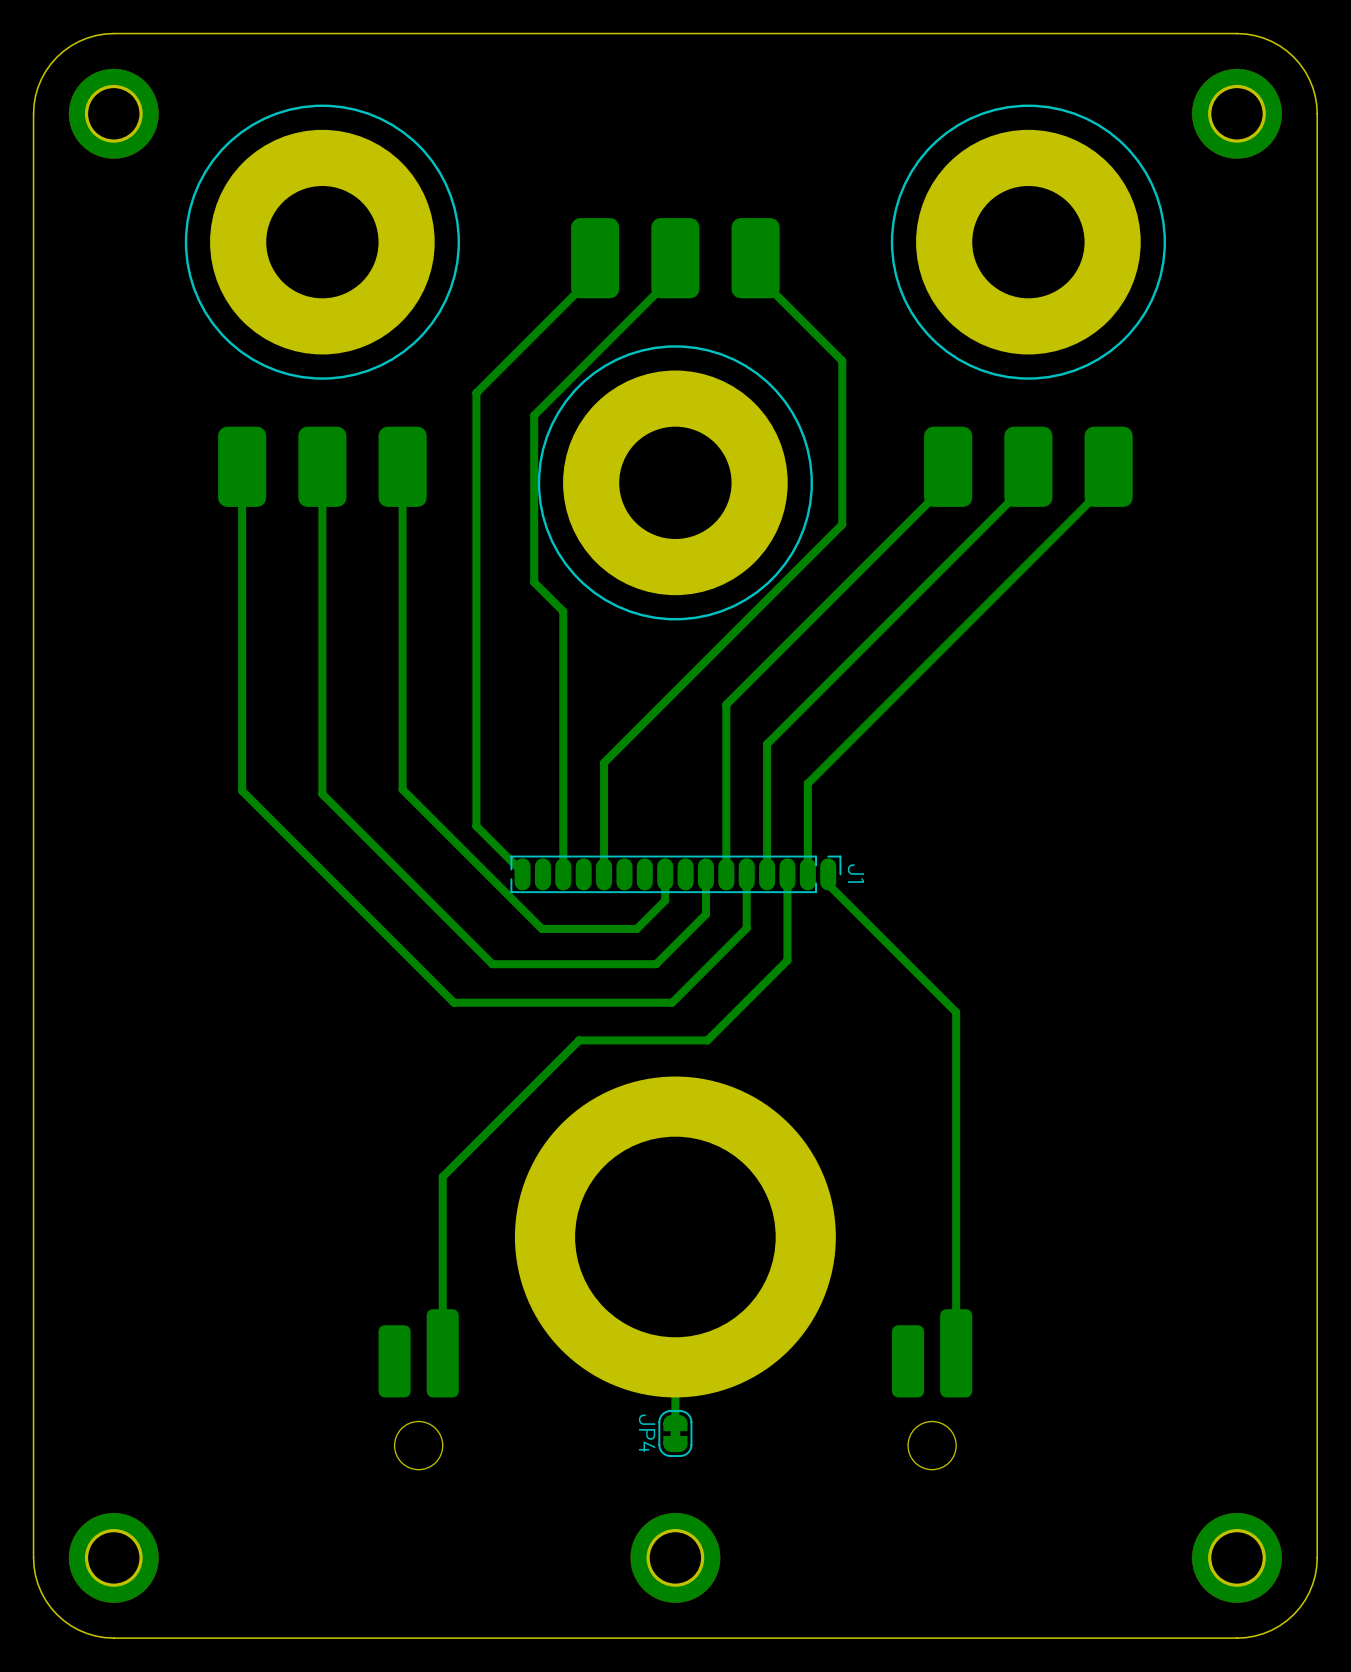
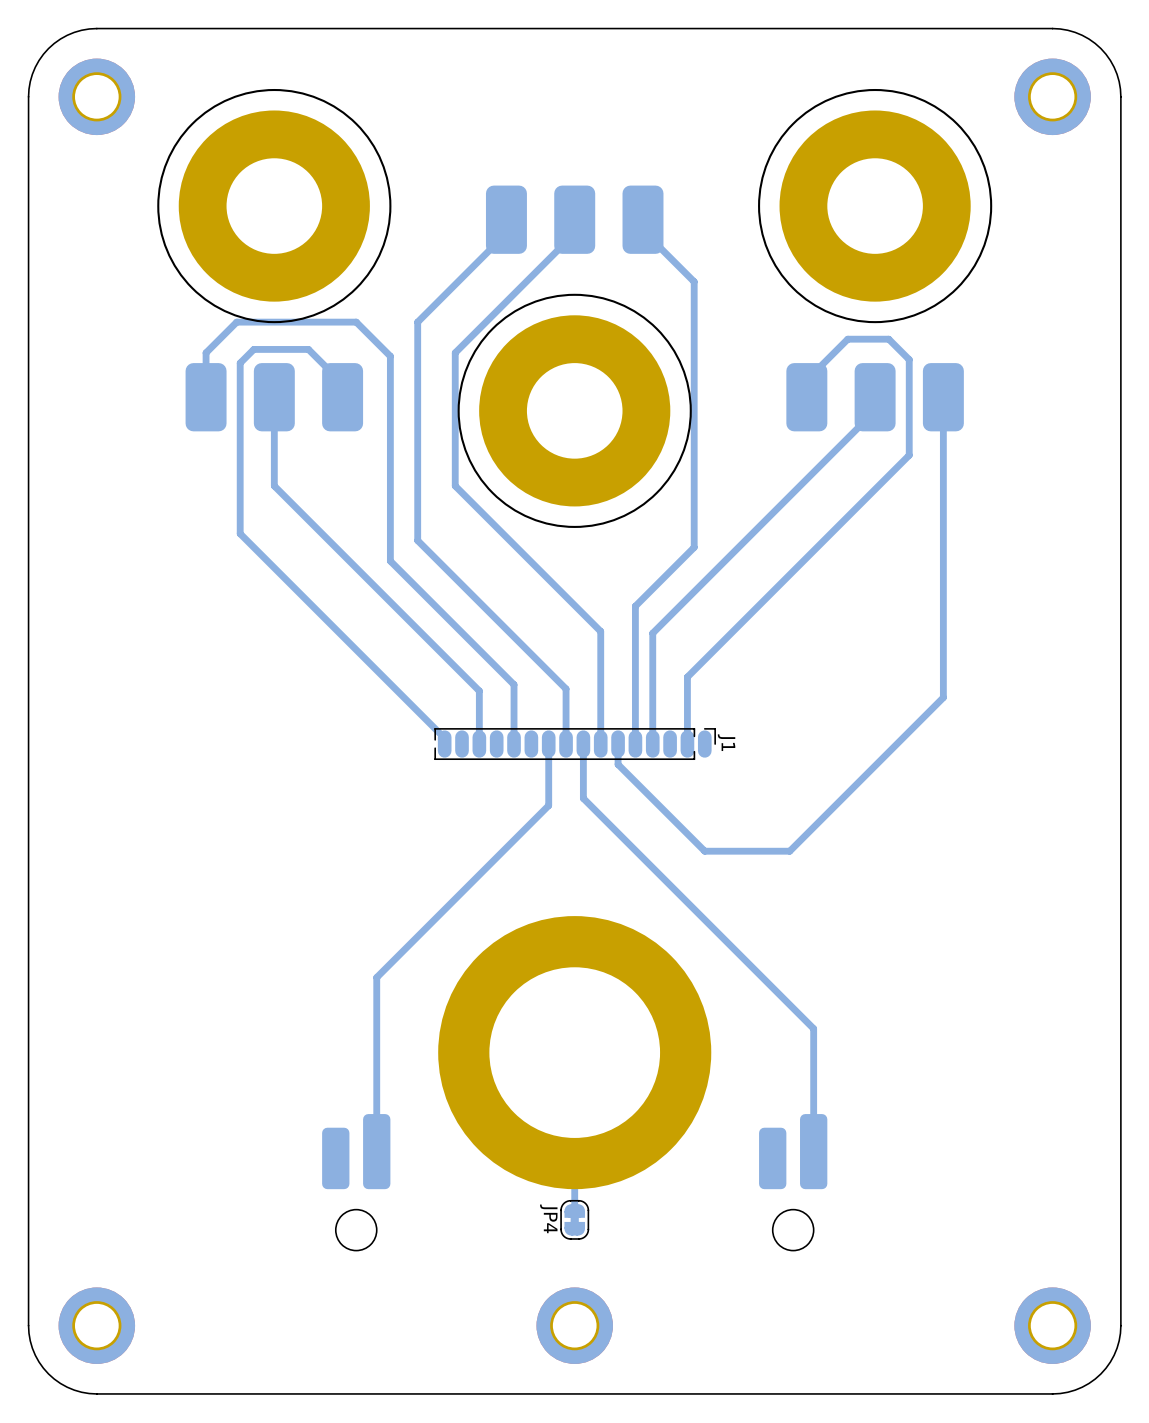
bottom track: (755, 258) (747, 266) (842, 360) (842, 524) (604, 762) (604, 804) -> (642, 219) (642, 230) (694, 281) (694, 547) (635, 606) (635, 744)
bottom track: (490, 378) (476, 392) (476, 826) (522, 872) -> (342, 397) (342, 383) (308, 349) (253, 349) (240, 363) (240, 533) (444, 738) (444, 742)
bottom track: none -> (417, 322) (417, 540) (566, 688) (566, 744)
bottom track: (534, 414) (534, 582) (563, 611) (563, 812) -> (455, 352) (455, 485) (600, 631) (600, 744)
bottom track: (242, 466) (242, 790) (453, 1002) (672, 1002) (746, 928) (746, 879) -> (206, 397) (206, 352) (236, 322) (356, 322) (390, 356) (390, 561) (514, 684)
bottom track: (402, 466) (402, 789) (541, 928) (636, 928) (665, 900) (665, 879) -> none
bottom track: (948, 466) (948, 482) (726, 704) (726, 874) -> (806, 397) (806, 380) (847, 339) (888, 339) (909, 359) (909, 455) (687, 677)
bottom track: (1108, 482) (807, 783) (807, 795) -> (943, 410) (943, 697) (789, 851) (704, 851) (618, 764) (618, 748)
bottom track: (322, 571) (322, 794) (492, 964) (656, 964) (705, 914) (705, 879) -> (274, 485) (479, 690)
bottom track: (787, 874) (787, 960) (707, 1040) (579, 1040) (442, 1176) -> (548, 744) (548, 805) (376, 977) (376, 1001)
bottom track: (828, 874) (828, 884) (956, 1012) (956, 1208) -> (583, 744) (583, 798) (813, 1028)

